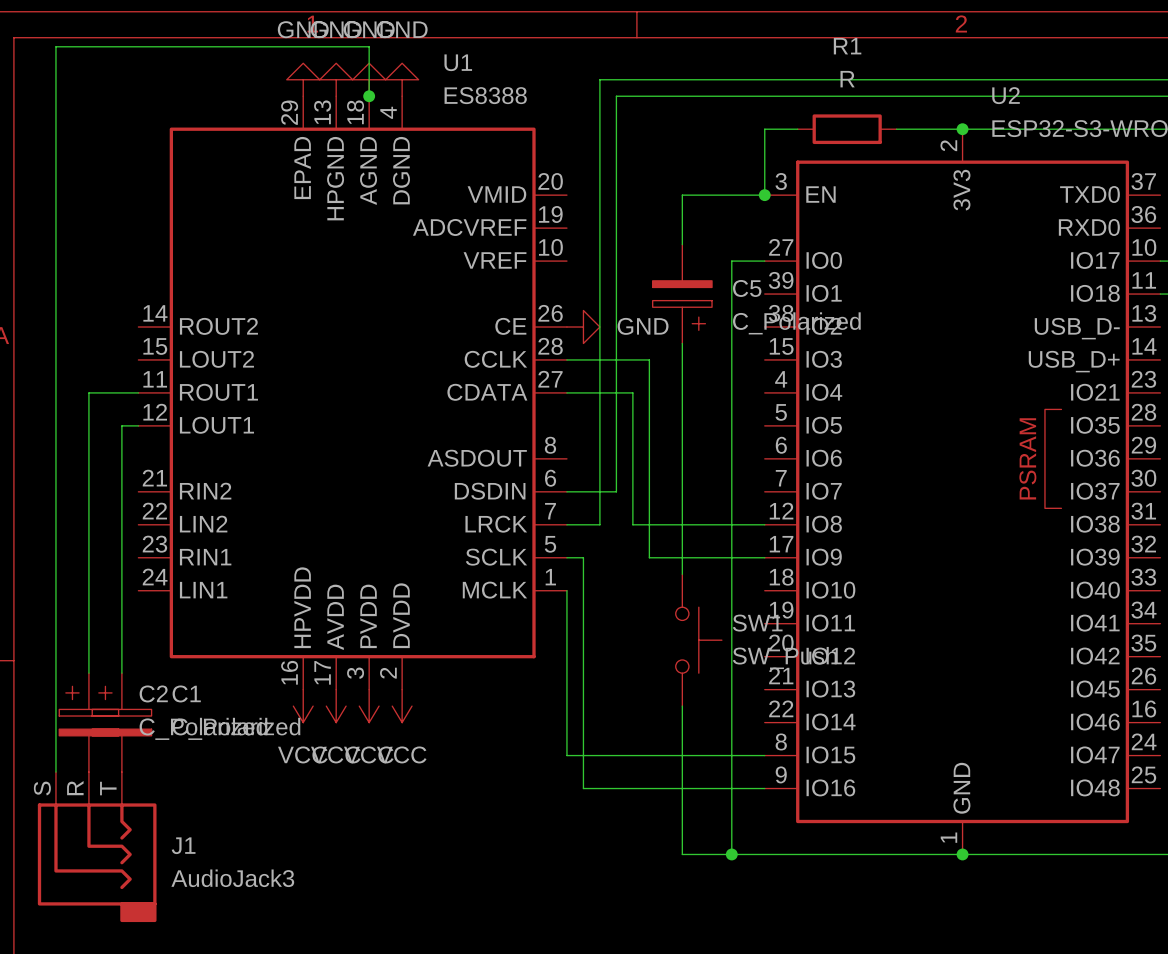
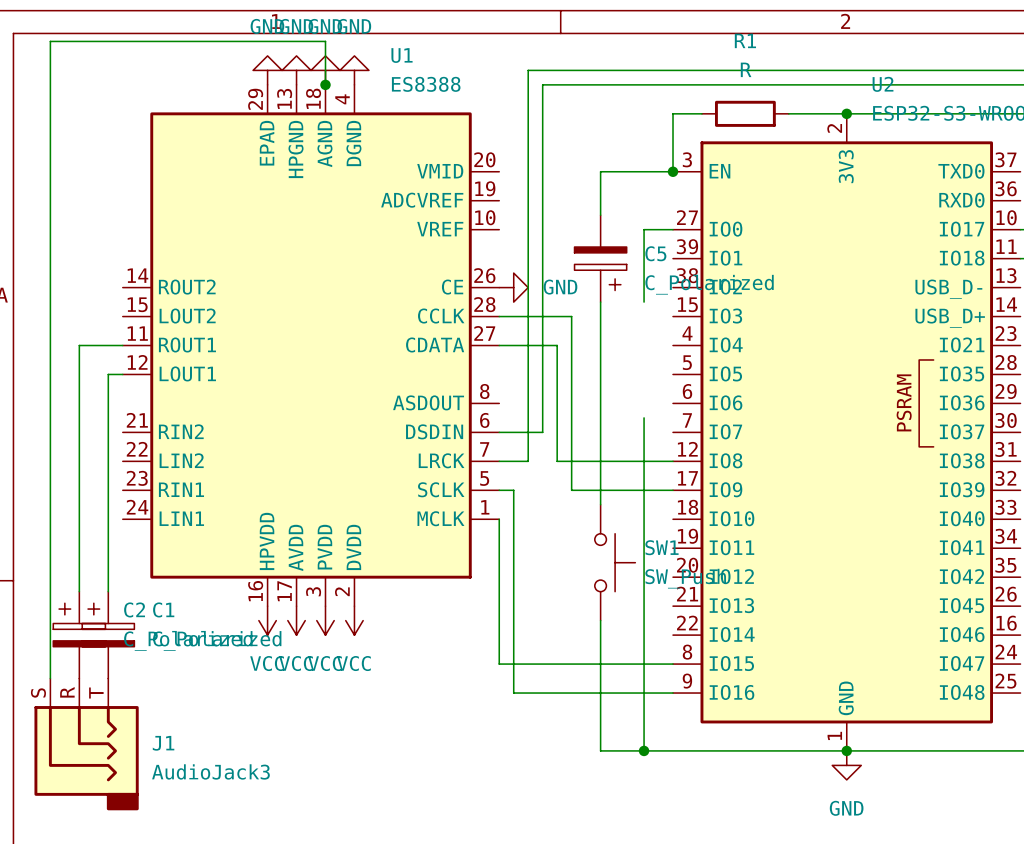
wire: (731, 343) (731, 475) -> none
power symbol: none -> GND (846, 765)

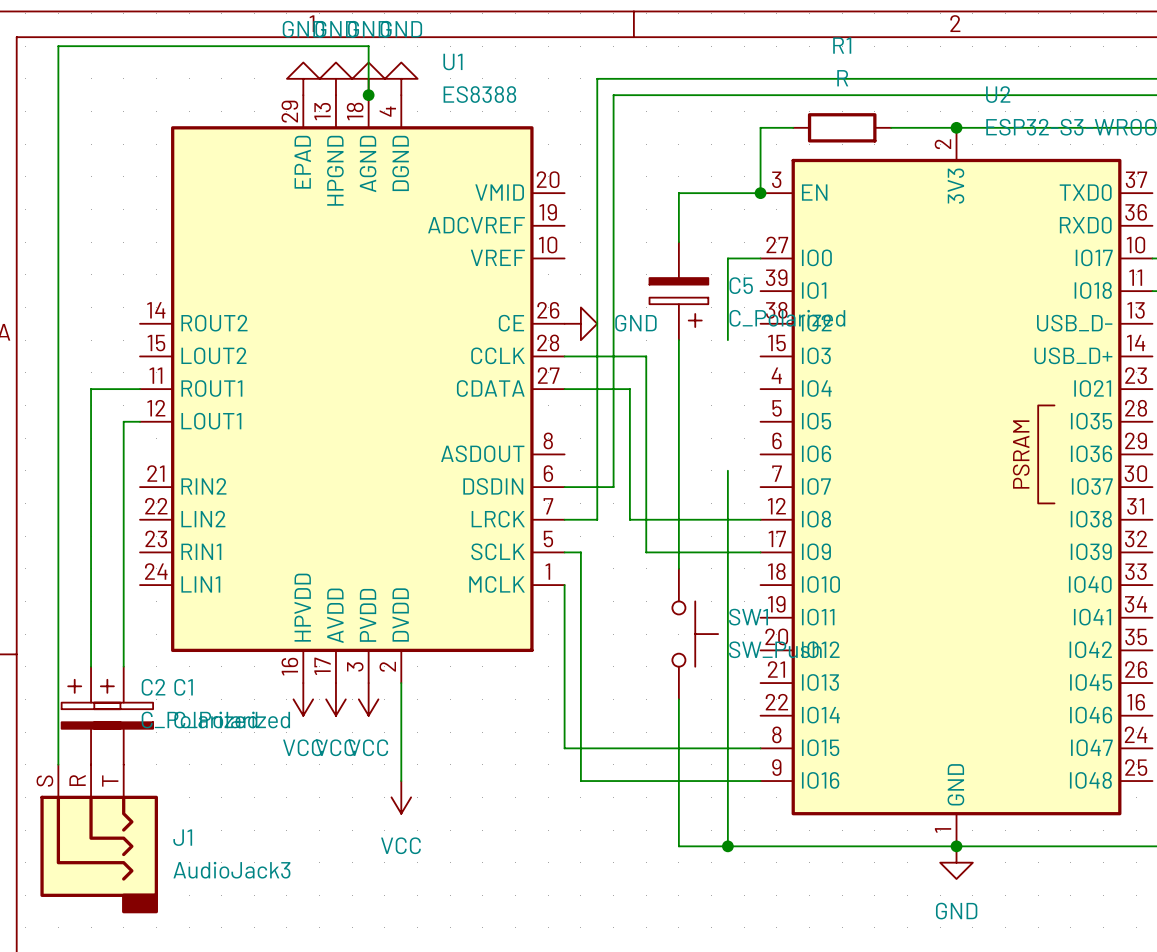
wire: none -> (401, 683) (401, 781)
power symbol position: VCC (354, 620) -> VCC (401, 797)

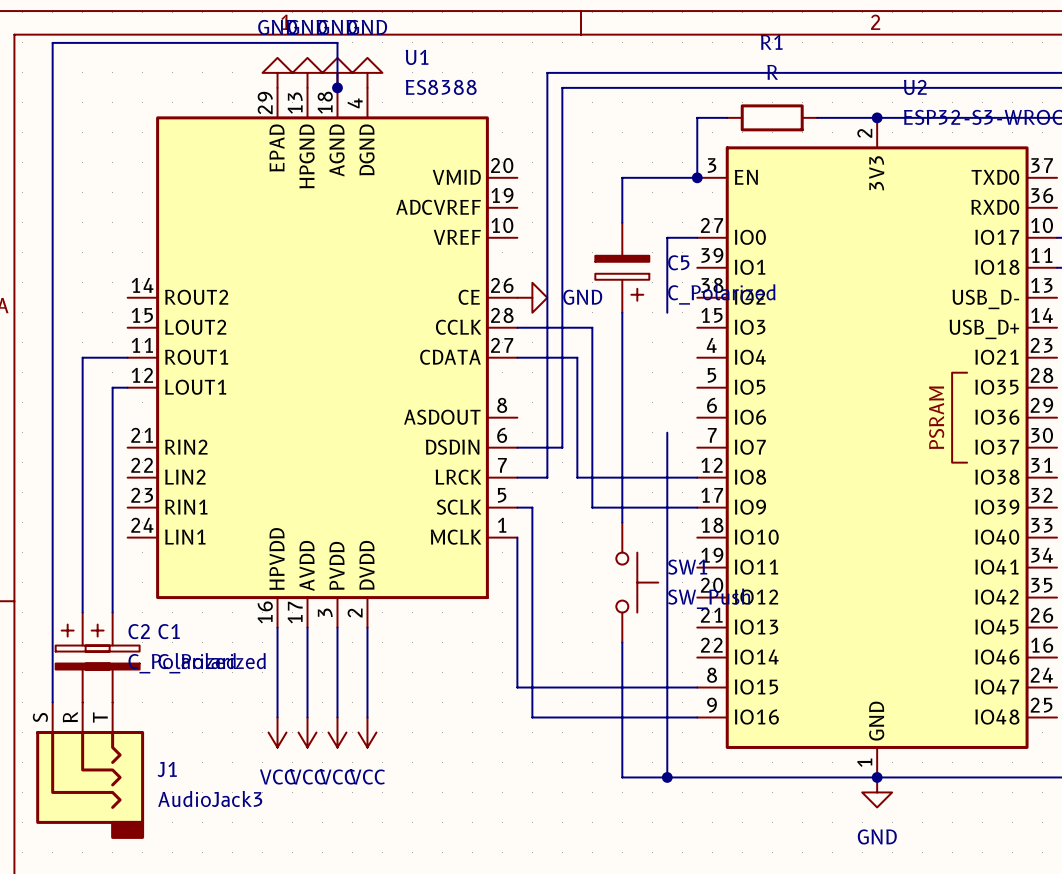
wire: none -> (277, 627) (277, 717)
wire: none -> (307, 627) (307, 717)
wire: none -> (337, 627) (337, 717)
power symbol: VCC (303, 699) -> none
power symbol: VCC (335, 699) -> none
power symbol: VCC (368, 699) -> none
power symbol: none -> VCC (277, 732)
power symbol: none -> VCC (307, 732)
power symbol: none -> VCC (337, 732)

